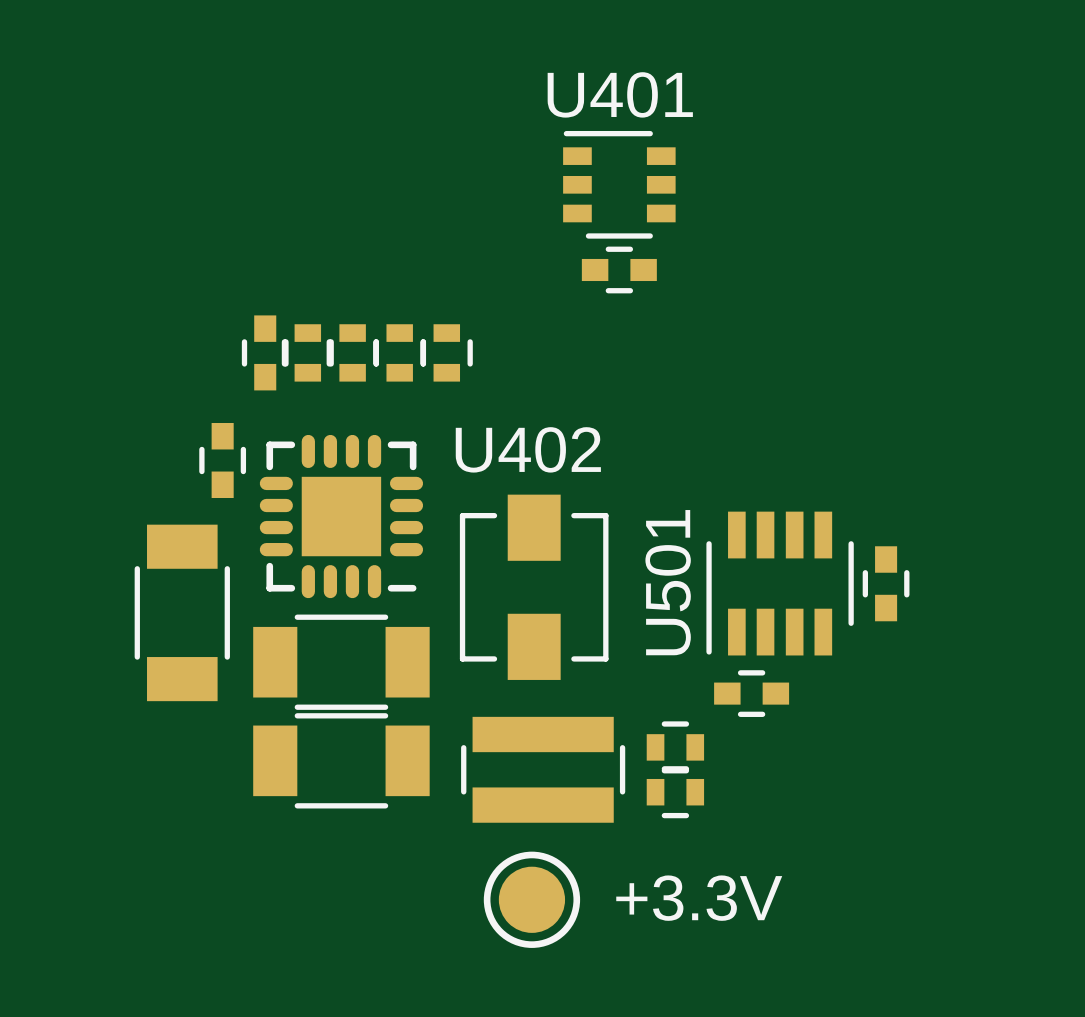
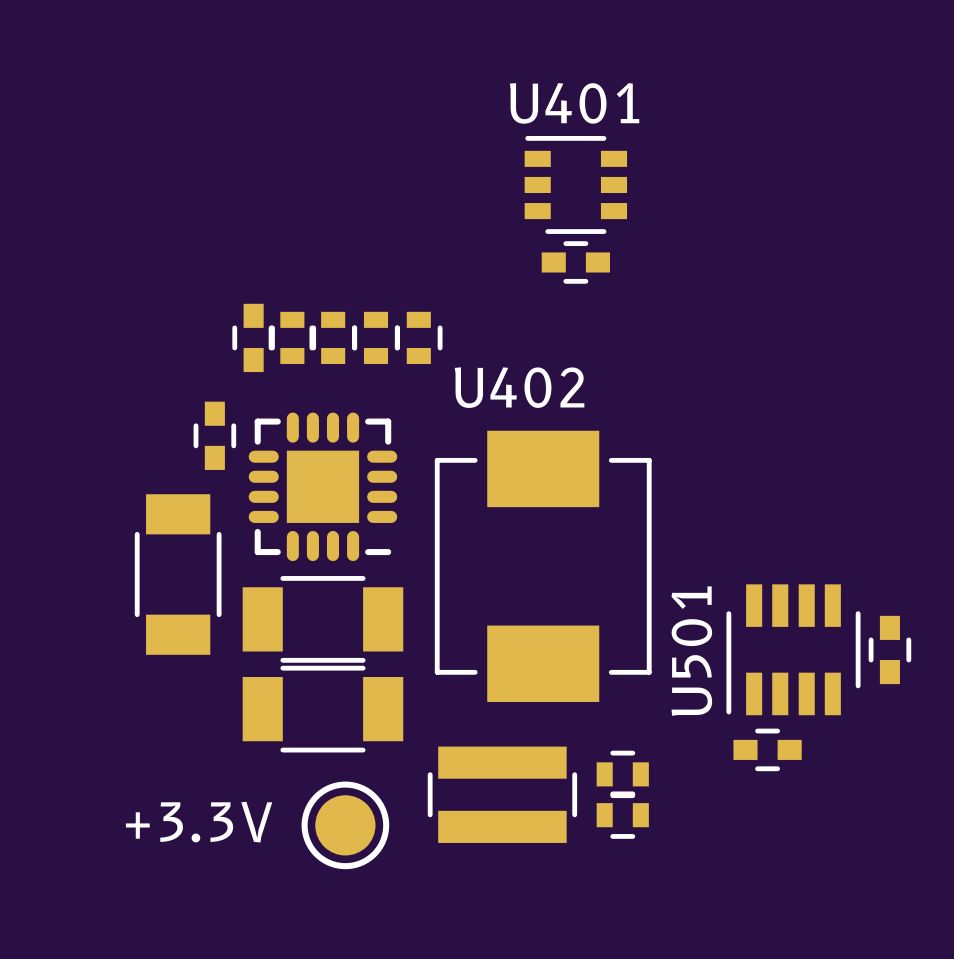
U402 name position: U402 (528, 449) -> U402 (519, 387)
U501 position: (780, 583) -> (793, 649)
part: (886, 583) -> none
part: (534, 587) -> none
part: none -> (543, 566)
part: (751, 693) -> none
part: none -> (889, 649)
part position: (675, 747) -> (622, 815)
part position: (543, 769) -> (502, 794)
part position: (675, 792) -> (622, 774)
part: none -> (767, 749)
text position: +3.3V (699, 898) -> +3.3V (199, 822)
part position: (531, 899) -> (345, 825)

